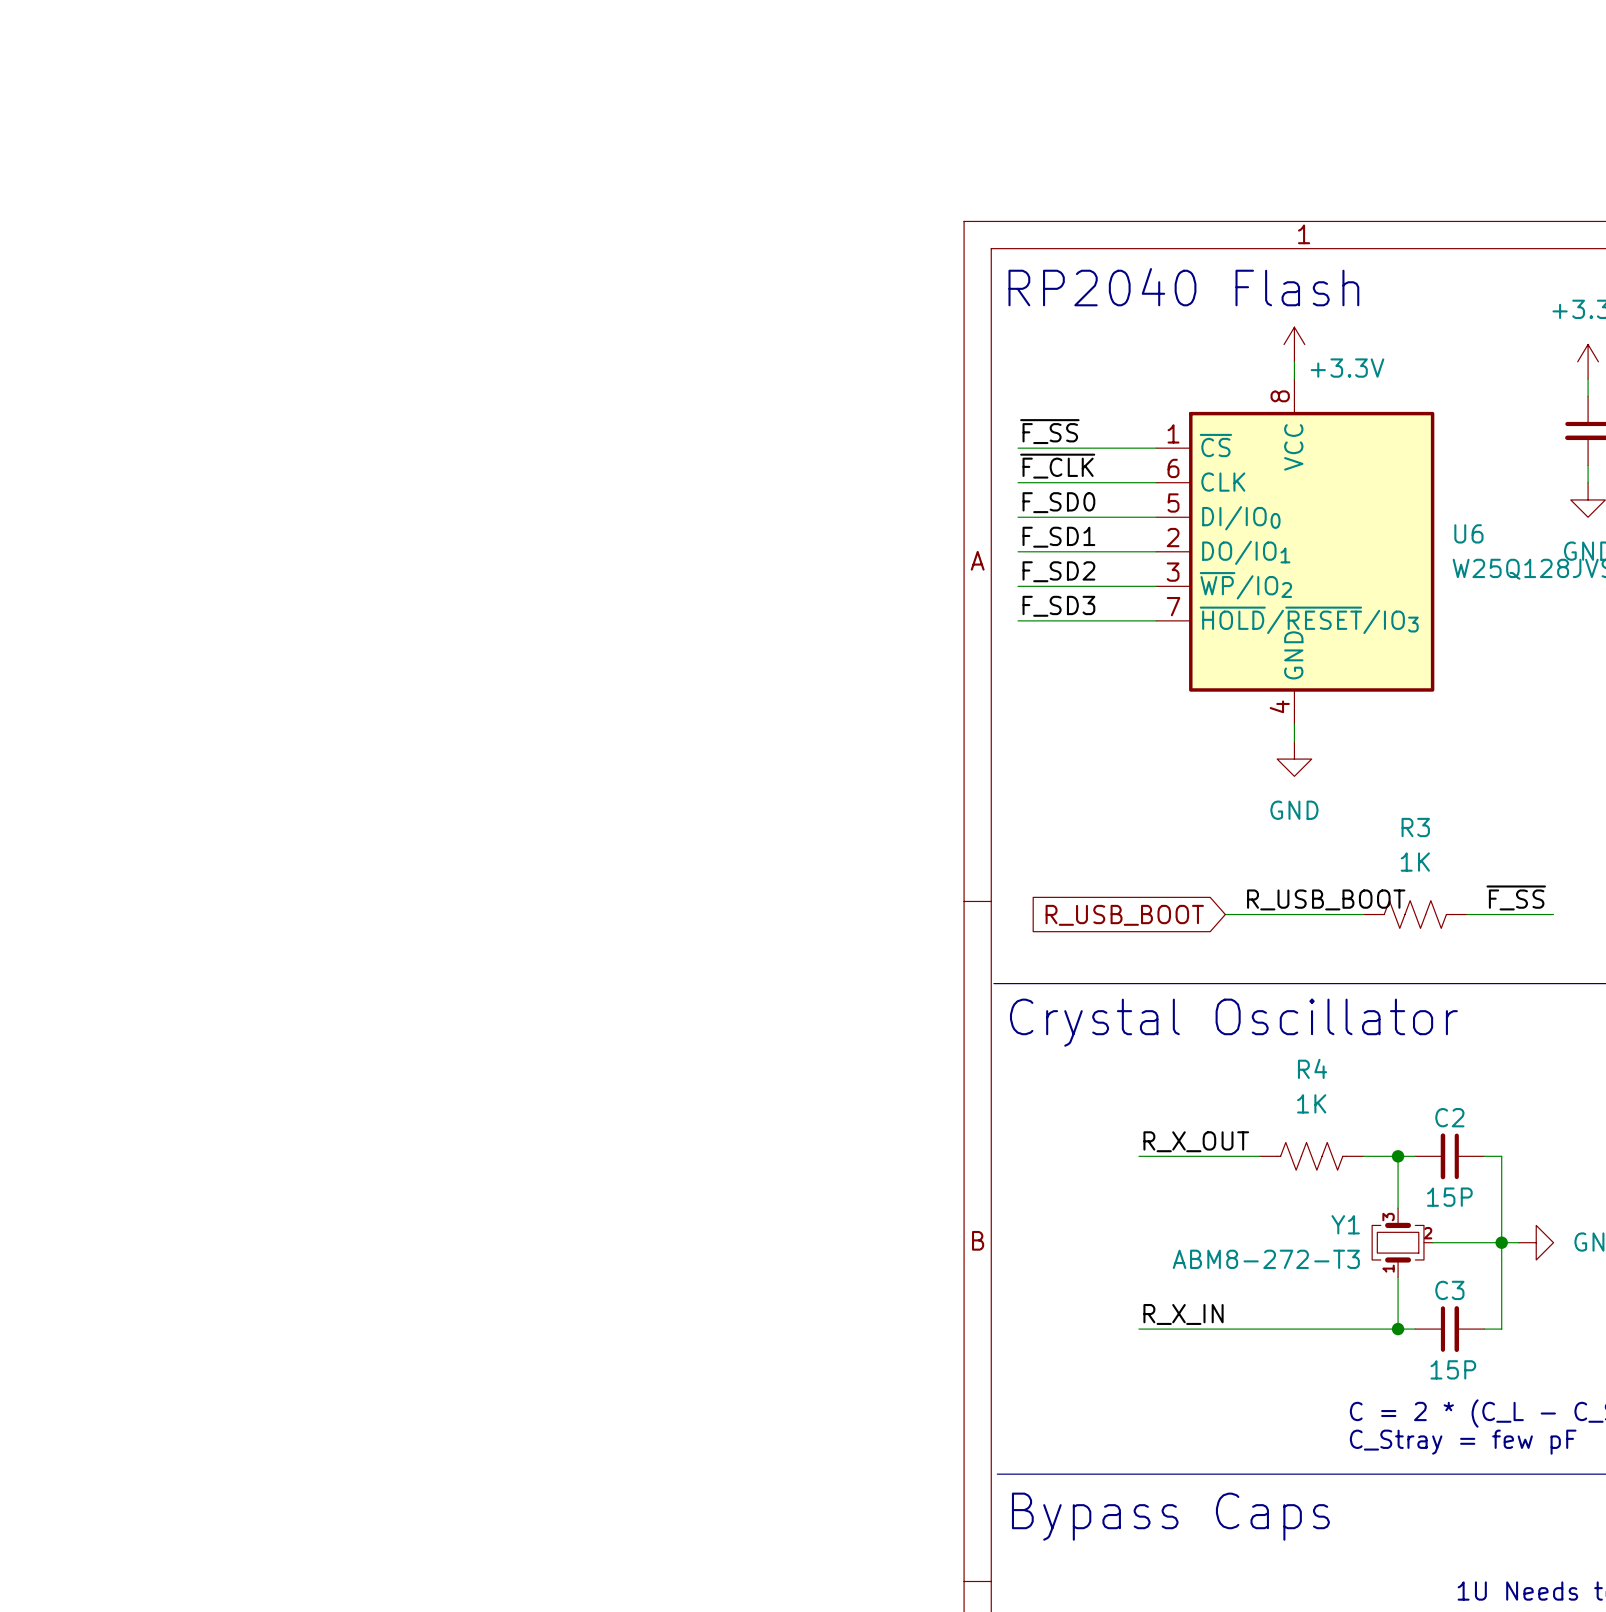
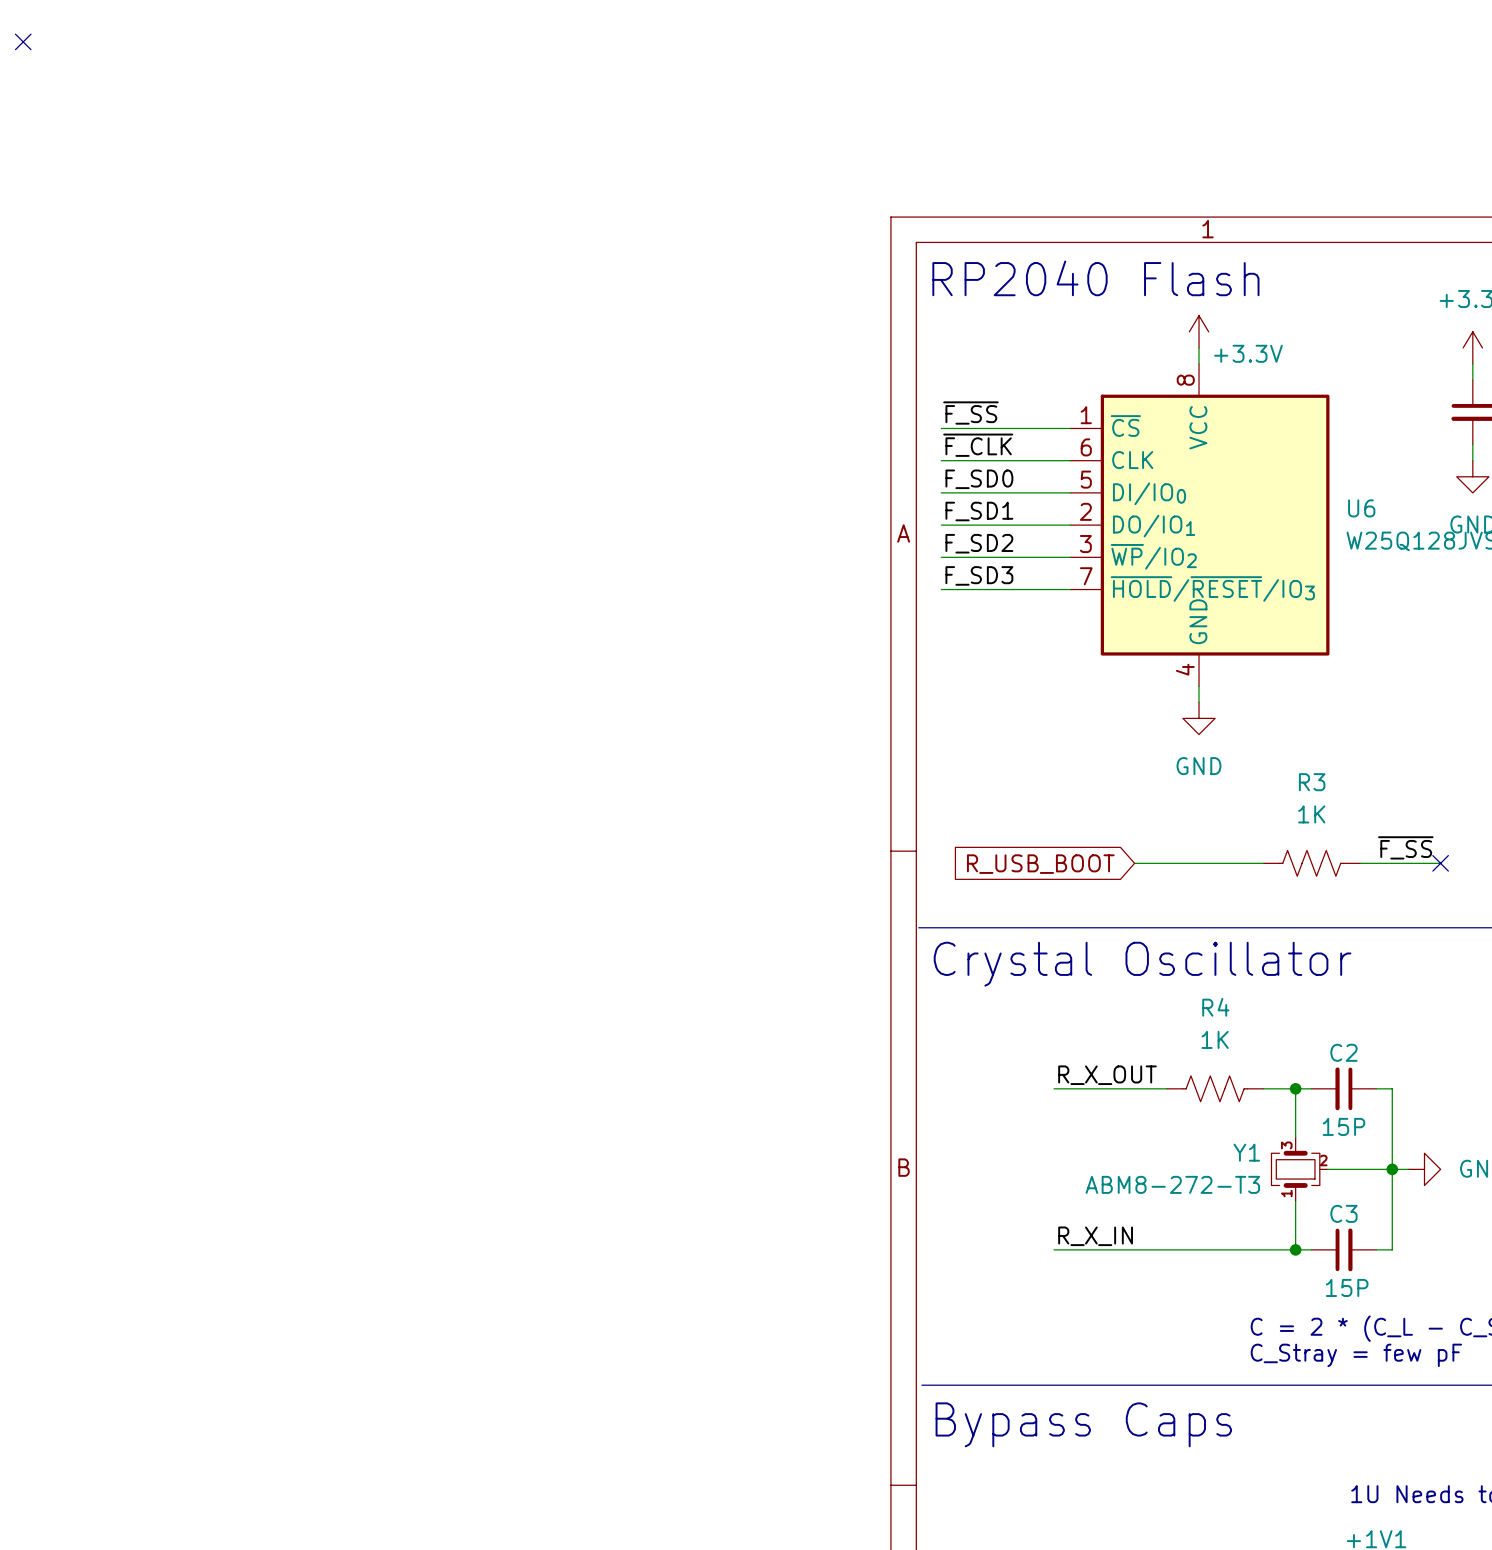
no-connect mark: none -> (23, 41)
label: R_USB_BOOT (1326, 899) -> none
no-connect mark: none -> (1440, 863)

